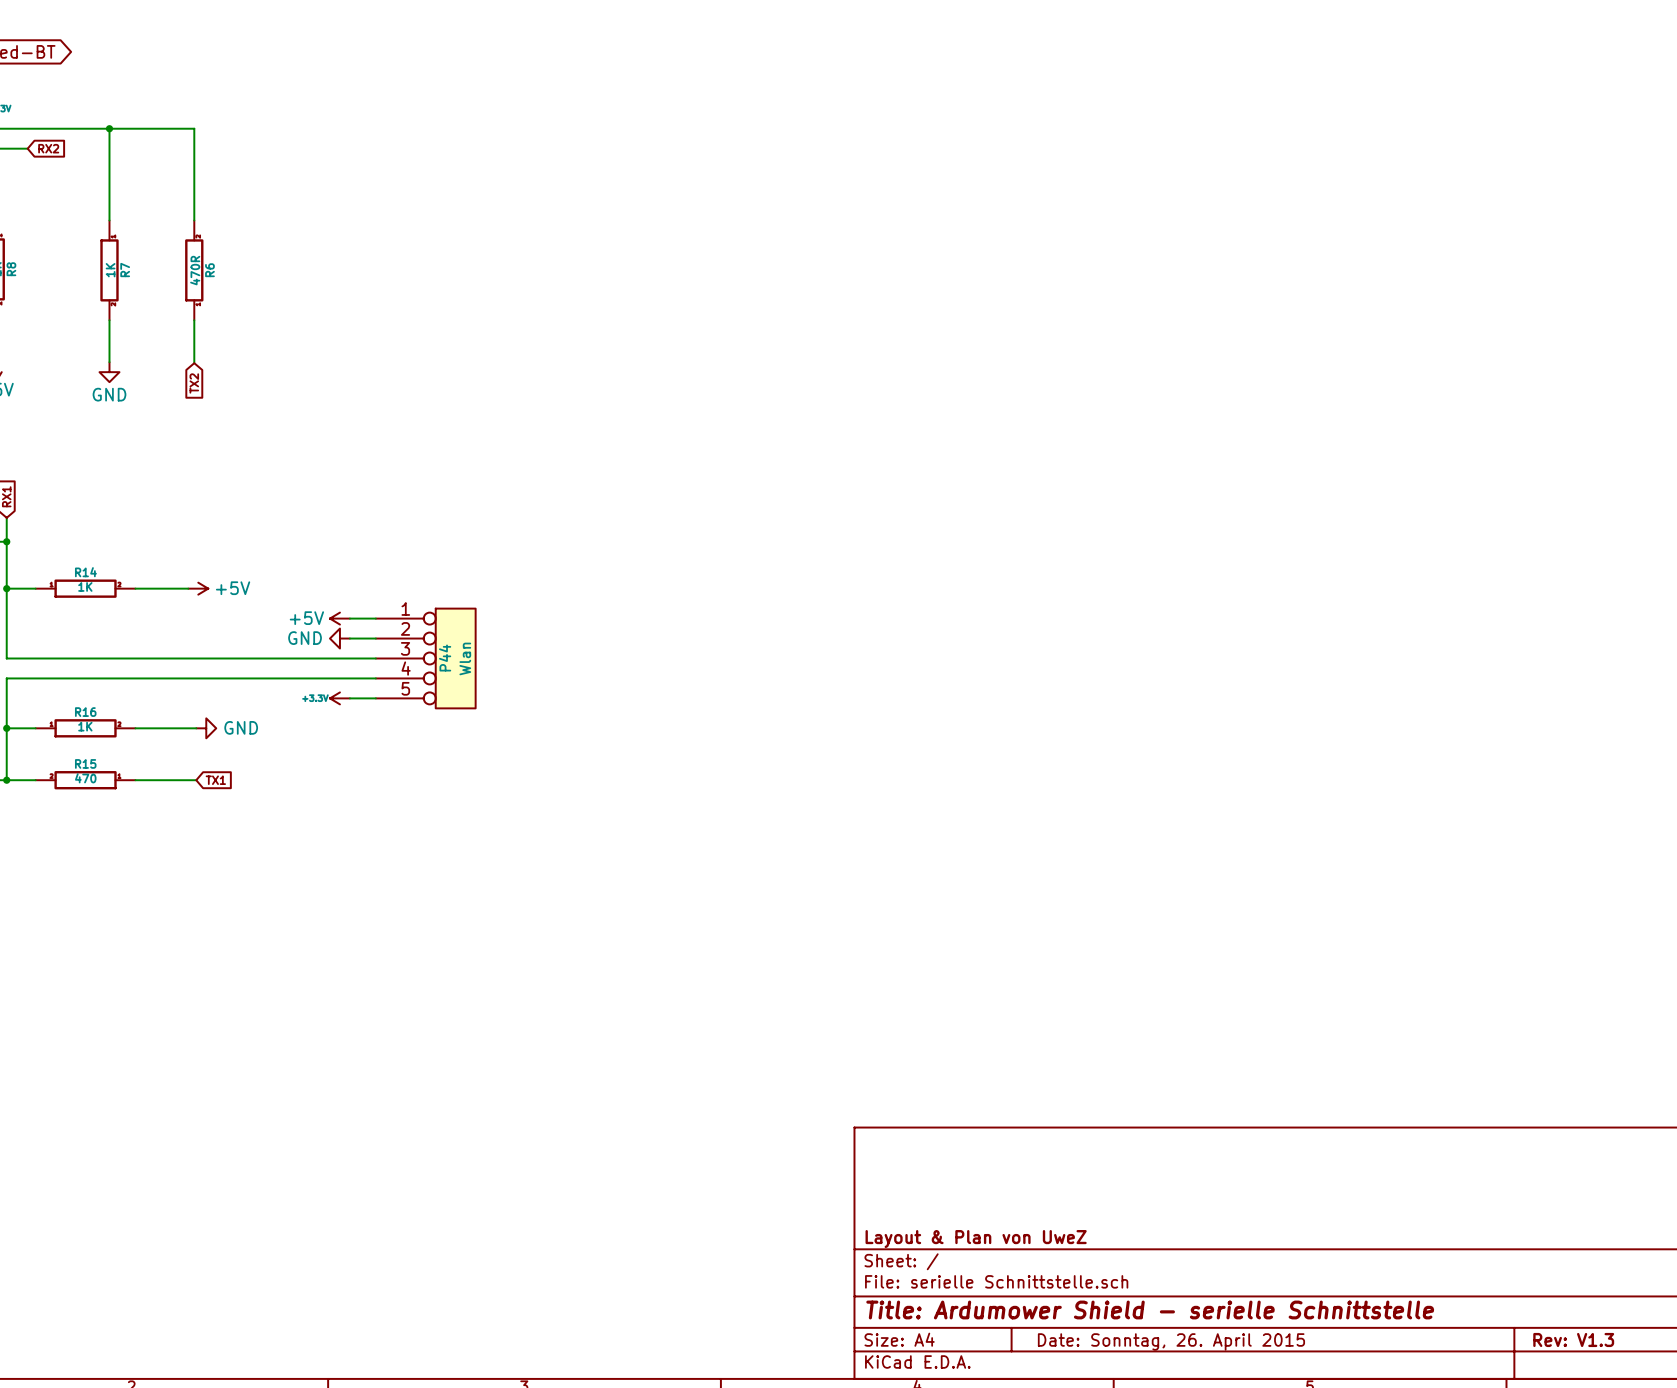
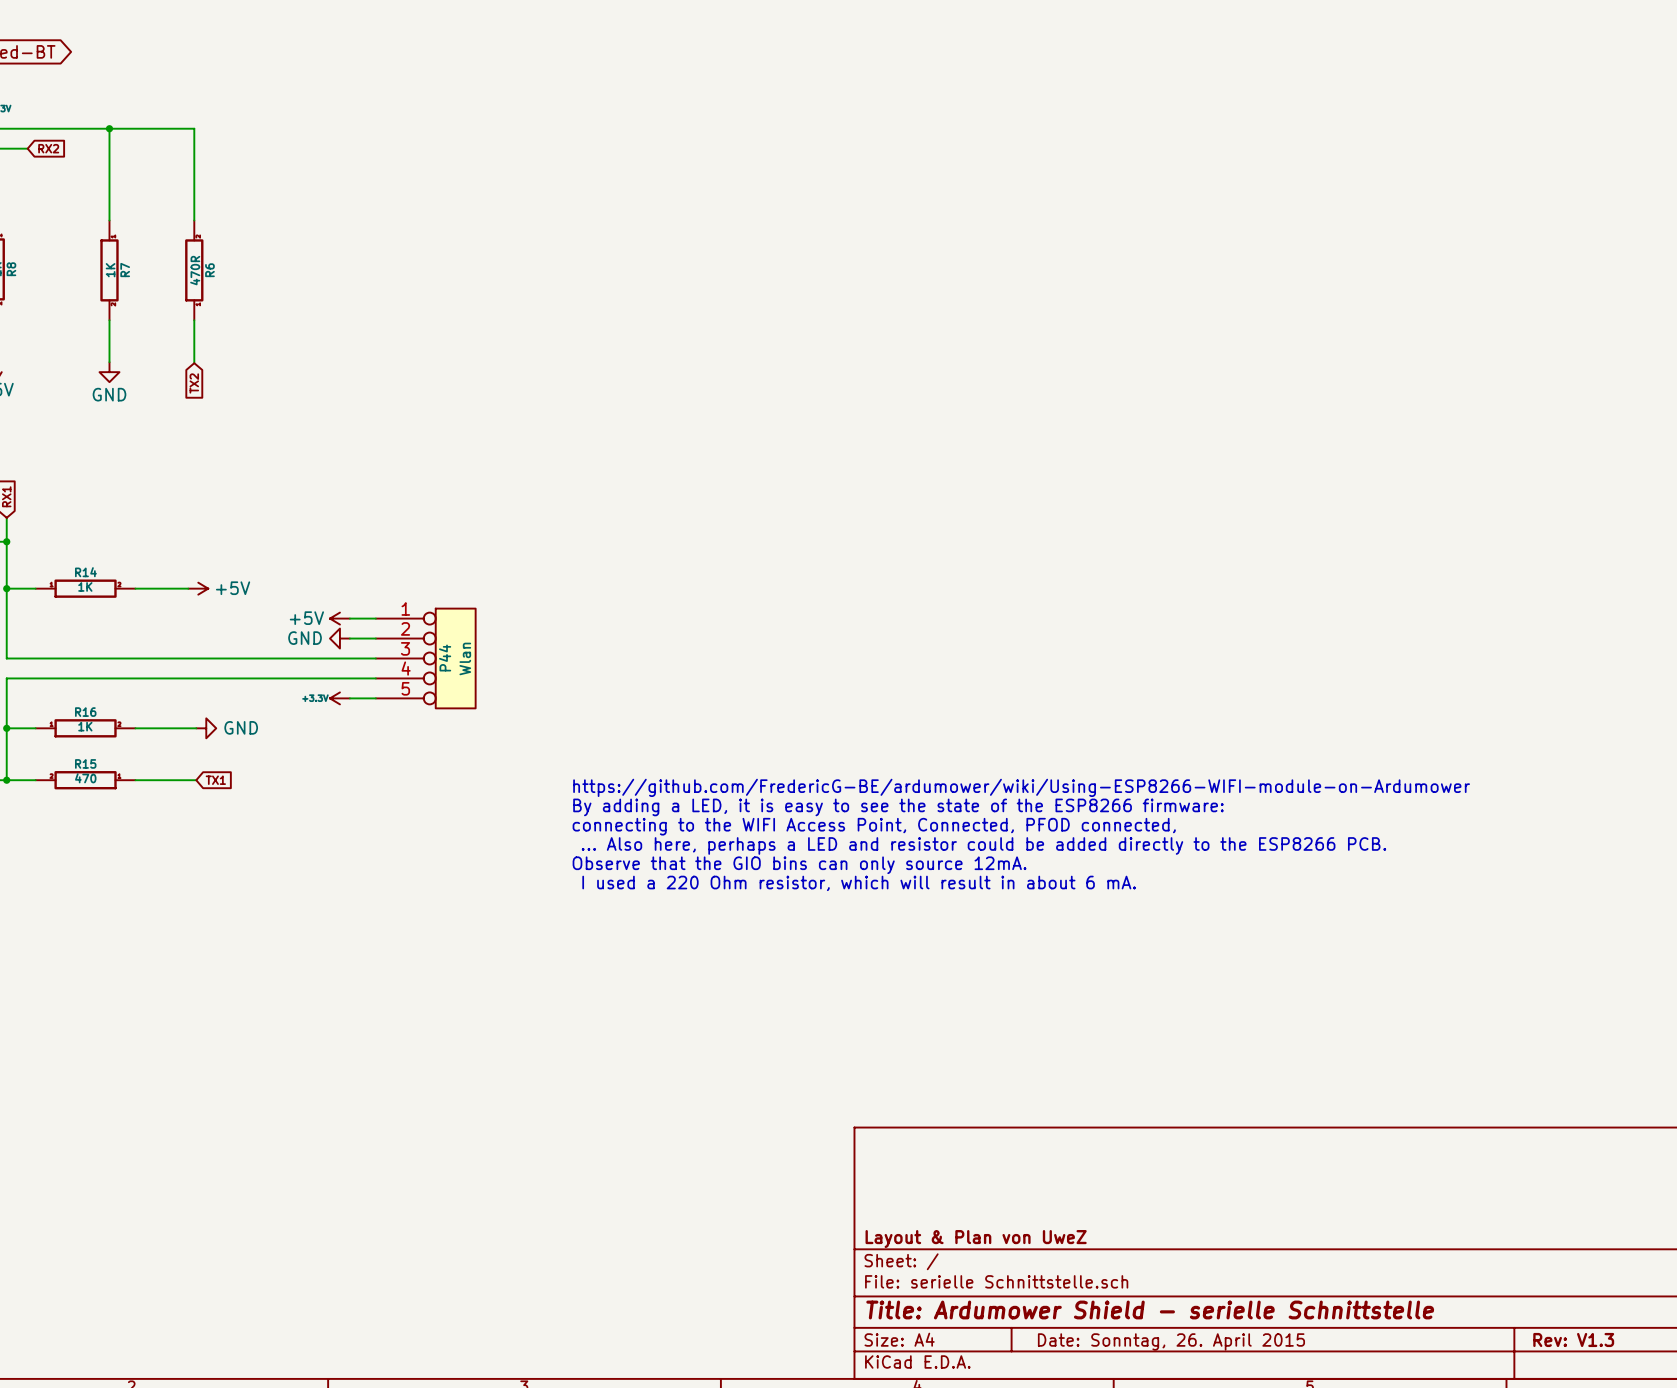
text: none -> https://github.com/FredericG-BE/ardumower/wiki/Using-ESP8266-WIFI-module-on-Ardumower (1021, 787)
text: none -> By adding a LED, it is easy to see the state of the ESP8266 firmware: (898, 807)
text: none -> connecting to the WIFI Access Point, Connected, PFOD connected, (874, 826)
text: none -> ... Also here, perhaps a LED and resistor could be added directly to the ESP8266 PCB. (983, 845)
text: none -> Observe that the GIO bins can only source 12mA. (799, 865)
text: none -> I used a 220 Ohm resistor, which will result in about 6 mA. (859, 883)

